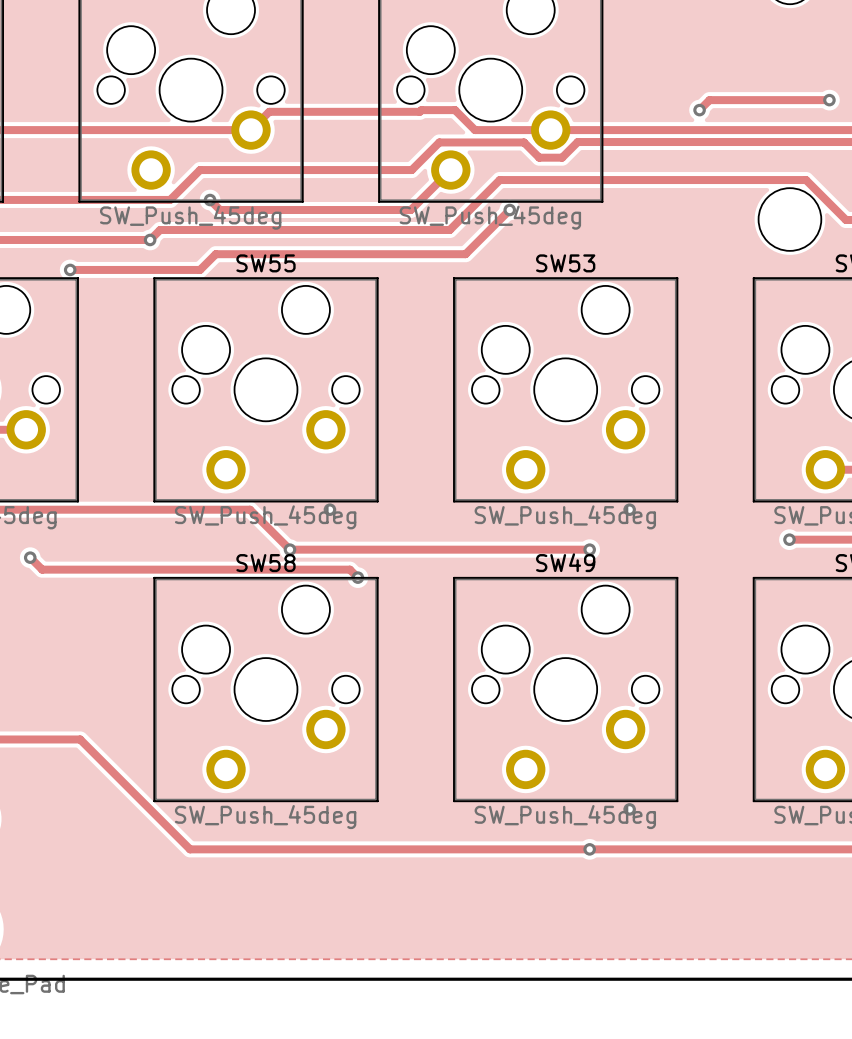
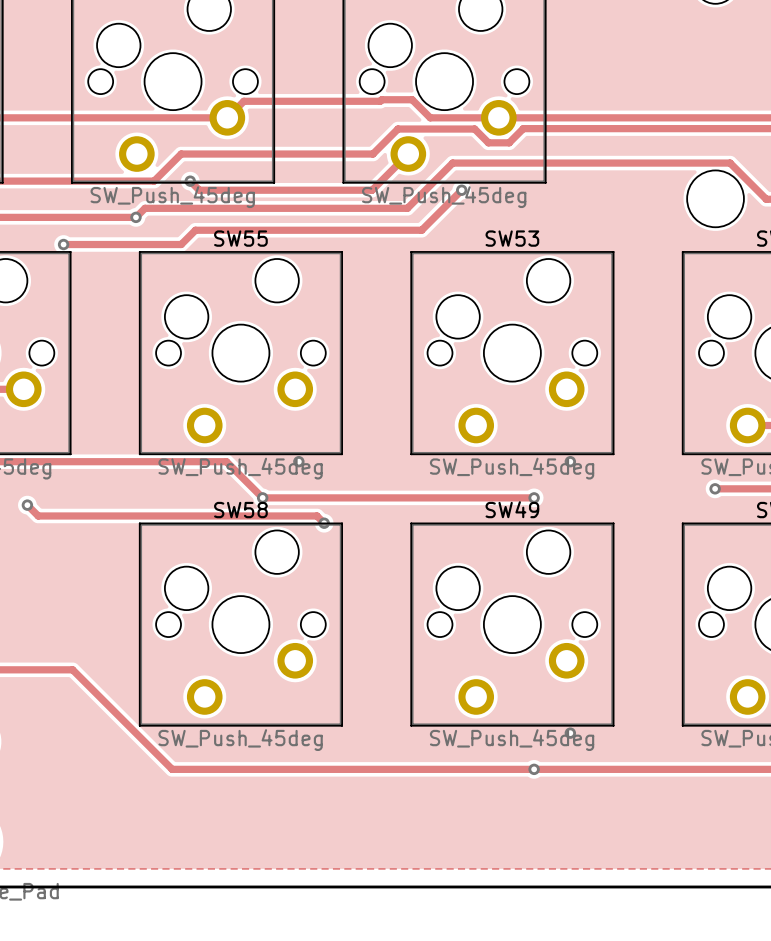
track: (829, 100) (709, 100) (699, 110) -> none
via: (829, 100) -> none
via: (699, 110) -> none

